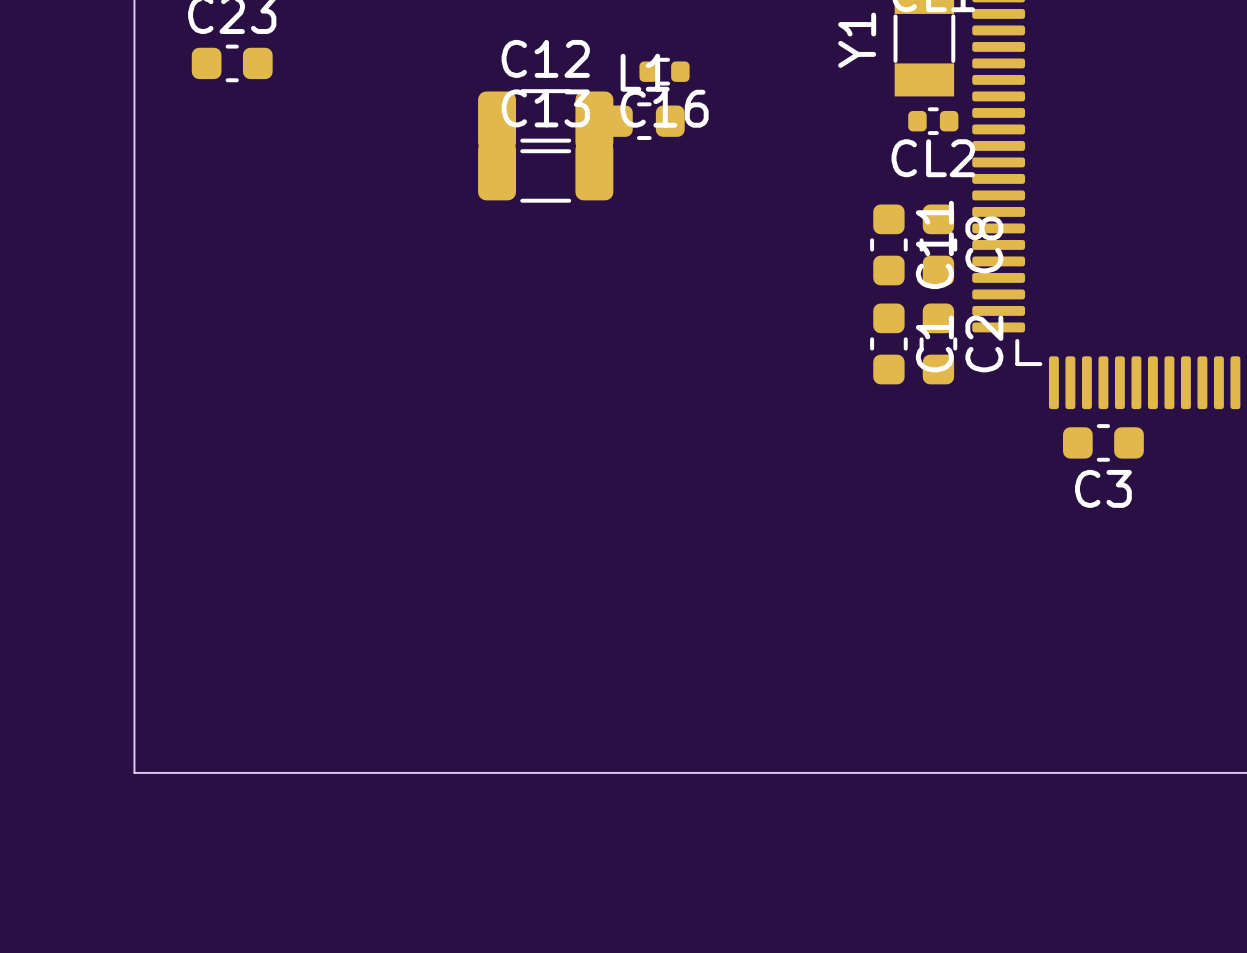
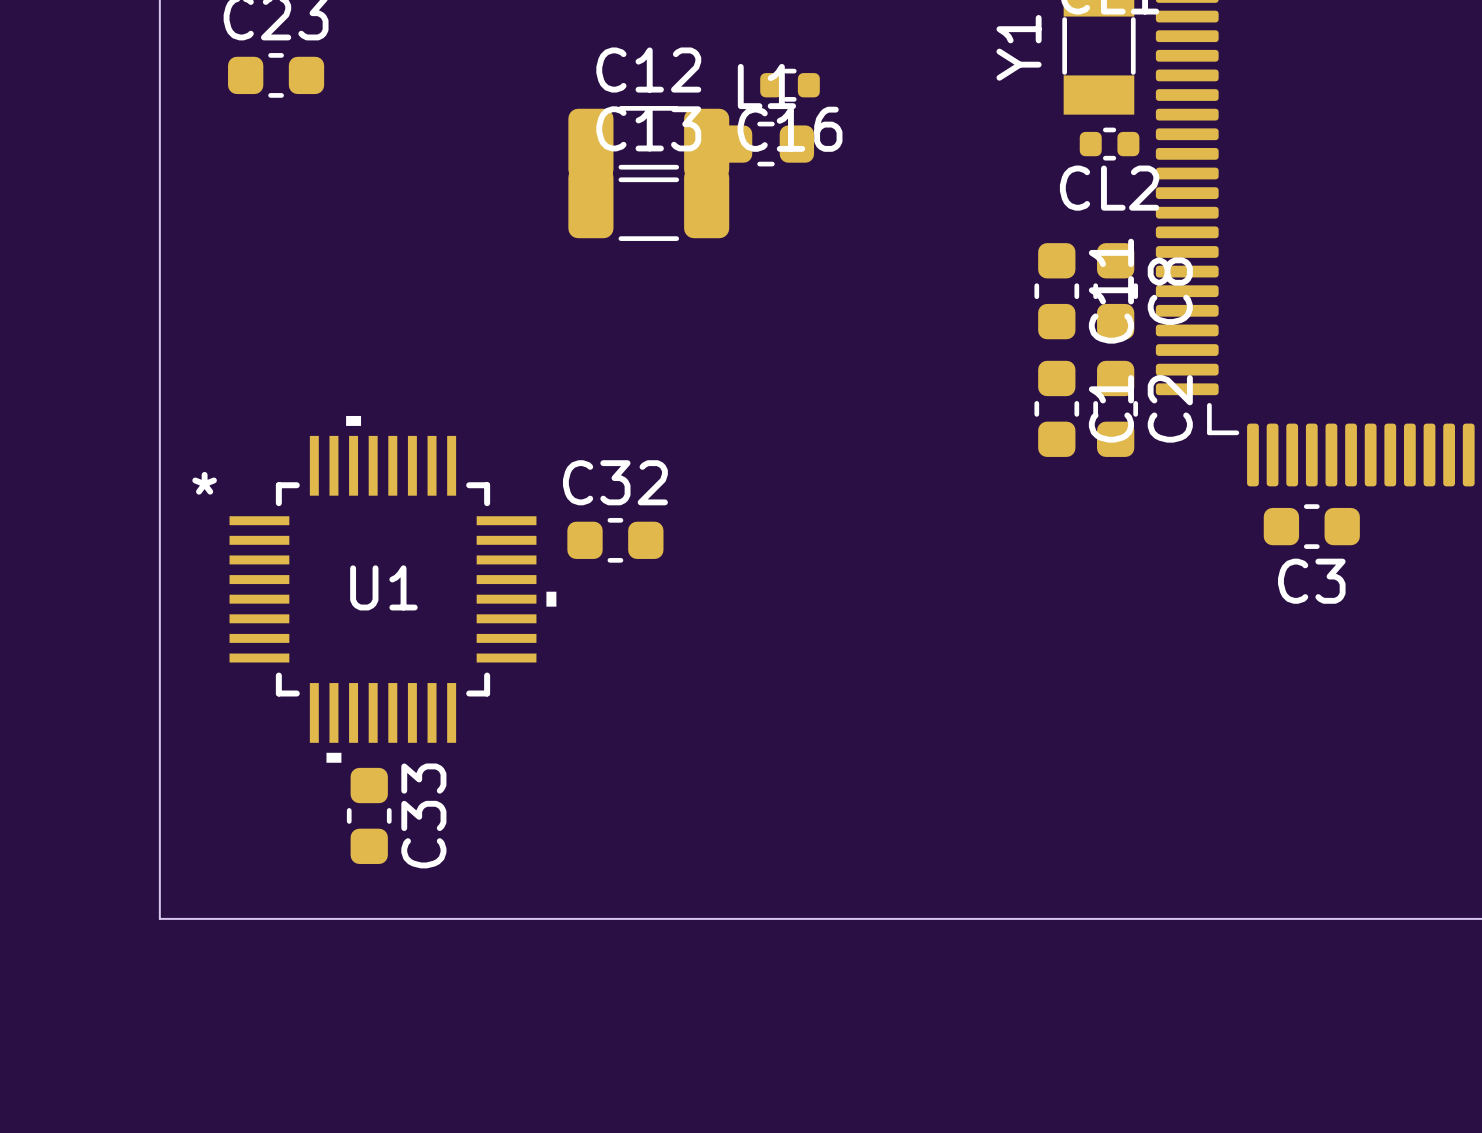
C32: none -> (615, 540)
U1: none -> (392, 589)
C33: none -> (369, 815)

